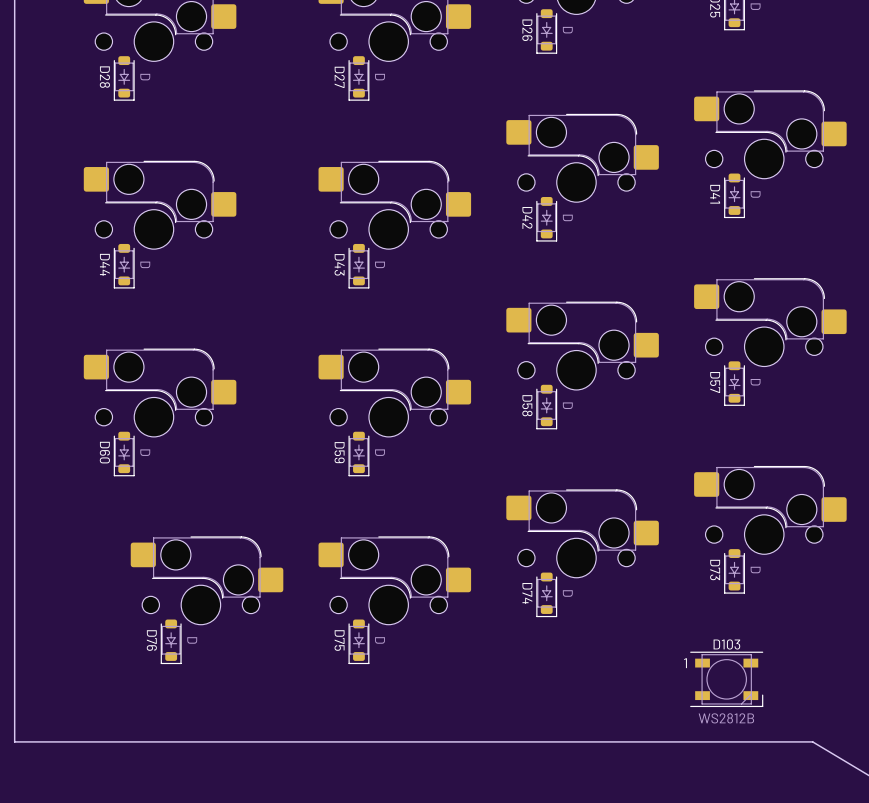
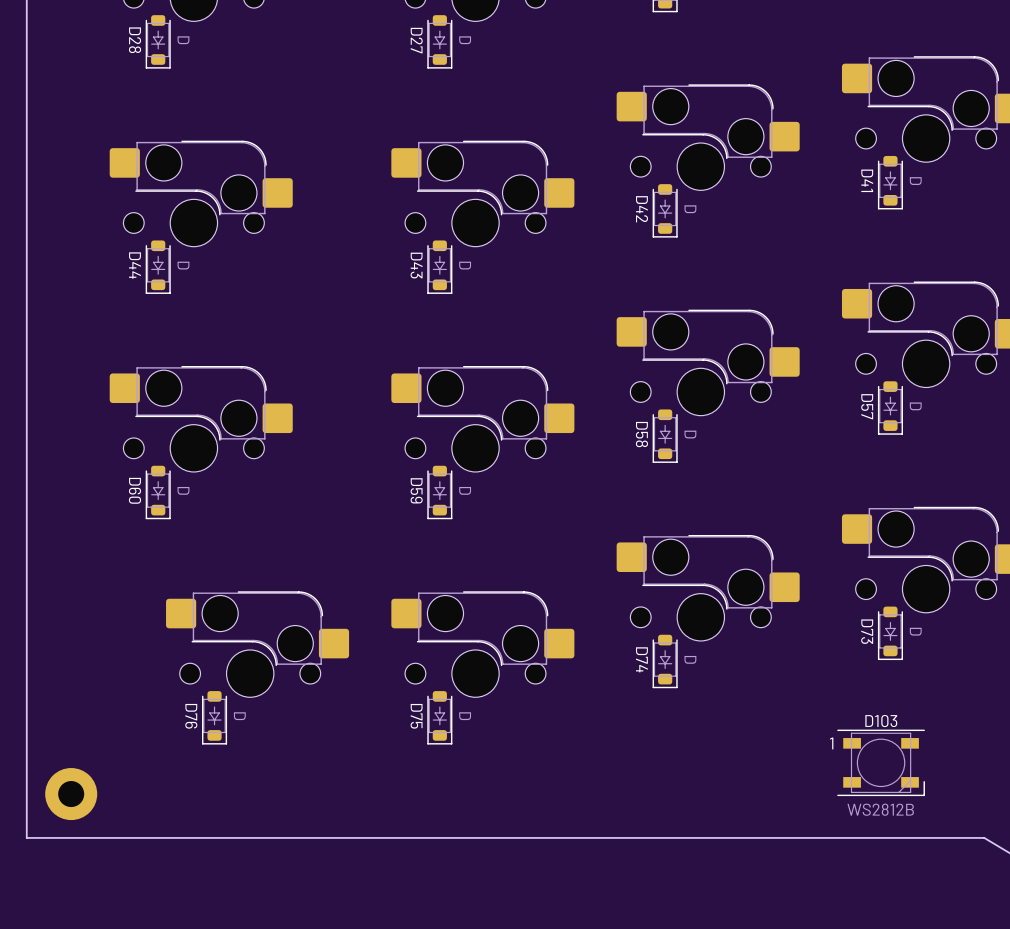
part: none -> (71, 794)

